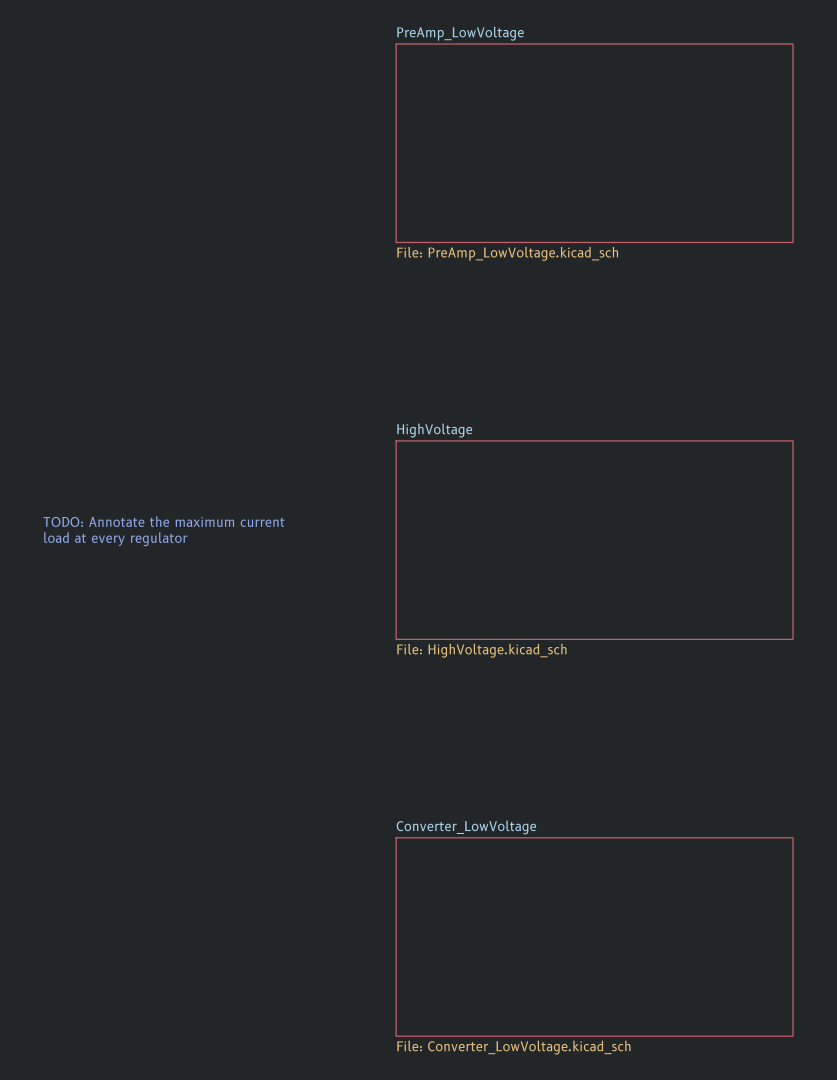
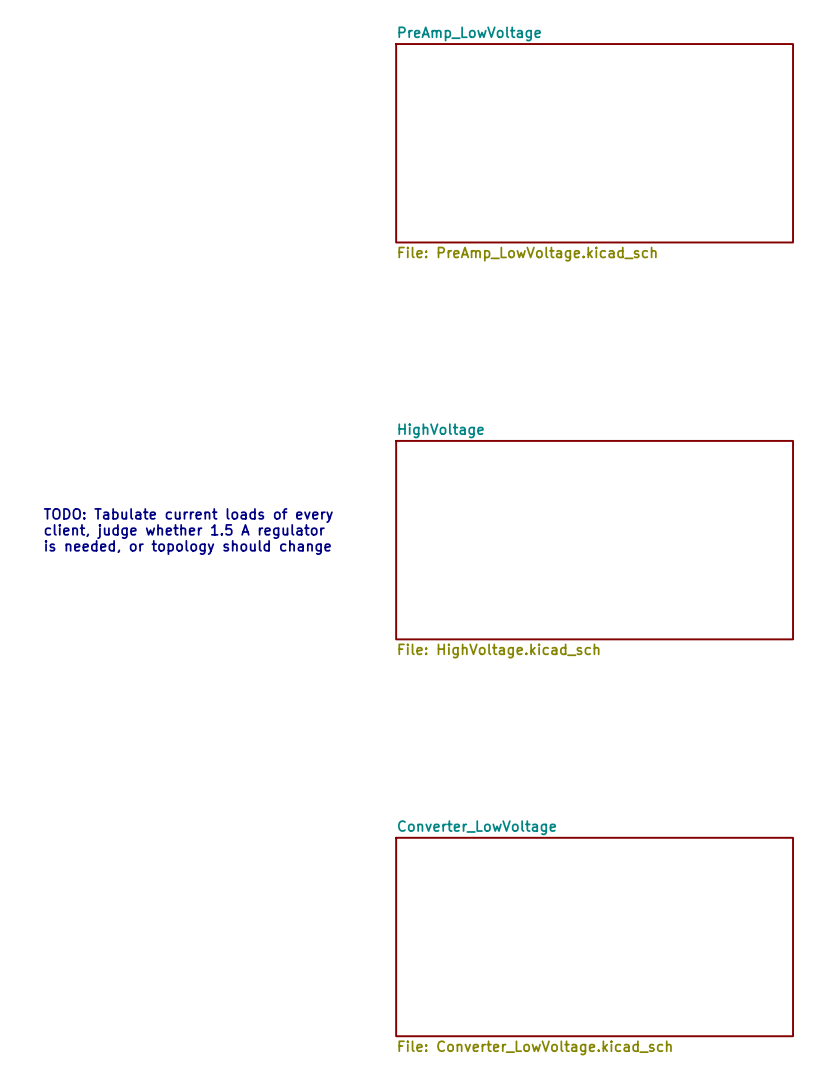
text: none -> TODO: Tabulate current loads of every (188, 515)
text: TODO: Annotate the maximum current (164, 521) -> none
text: none -> client, judge whether 1.5 A regulator (184, 531)
text: load at every regulator (115, 539) -> none
text: none -> is needed, or topology should change (187, 547)

